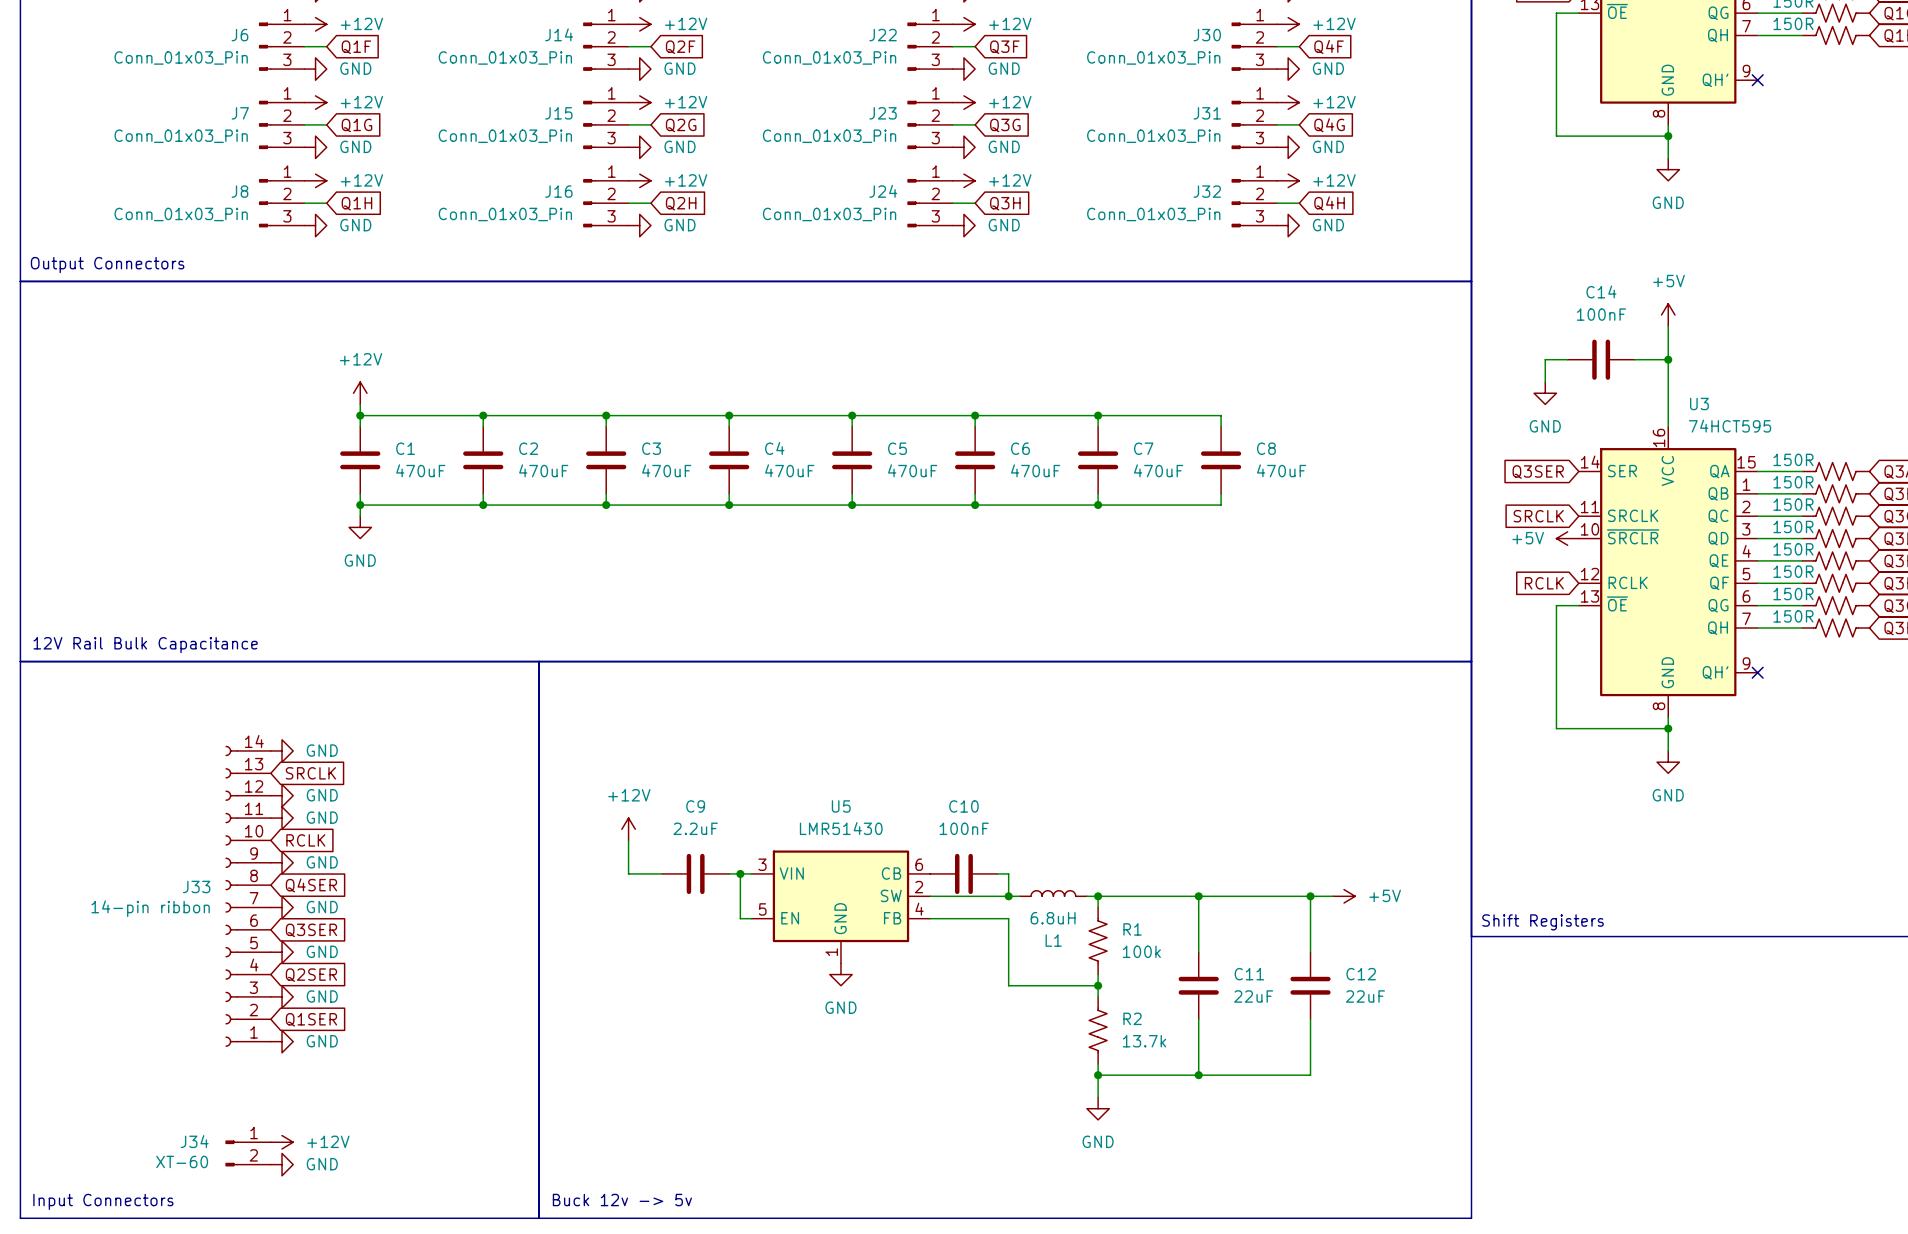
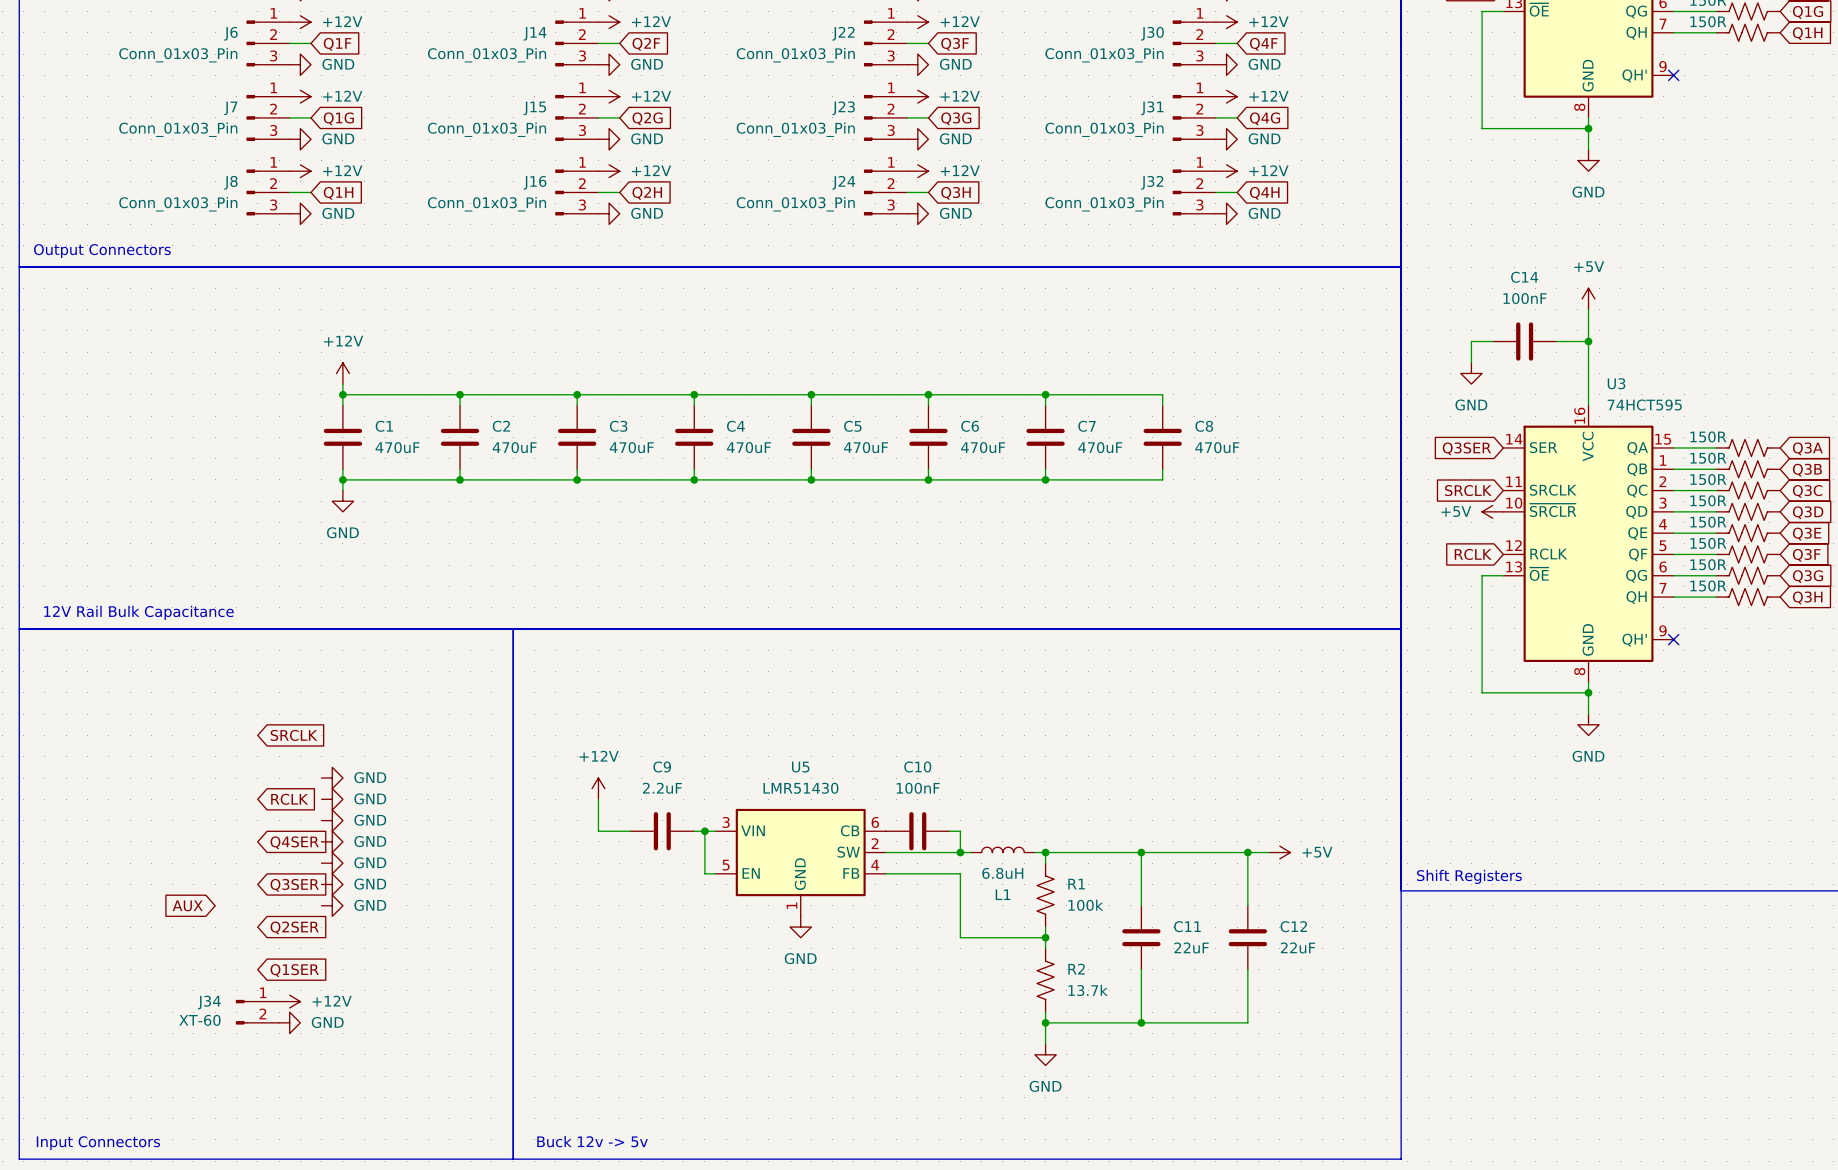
power symbol: GND (282, 750) -> none
power symbol: GND (282, 795) -> none
power symbol: GND (282, 818) -> none
power symbol: none -> GND (332, 778)
power symbol: none -> GND (332, 799)
power symbol: GND (282, 862) -> none
power symbol: none -> GND (332, 820)
power symbol: none -> GND (332, 841)
J33: 14-pin ribbon (248, 896) -> none
power symbol: GND (282, 907) -> none
power symbol: none -> GND (332, 863)
power symbol: none -> GND (332, 884)
global label: none -> AUX (187, 905)
power symbol: GND (282, 952) -> none
power symbol: none -> GND (332, 905)
power symbol: GND (282, 996) -> none
power symbol position: GND (282, 1041) -> GND (289, 1022)
power symbol position: +12V (282, 1142) -> +12V (289, 1001)
J34 position: (248, 1153) -> (257, 1012)
power symbol: GND (282, 1164) -> none

